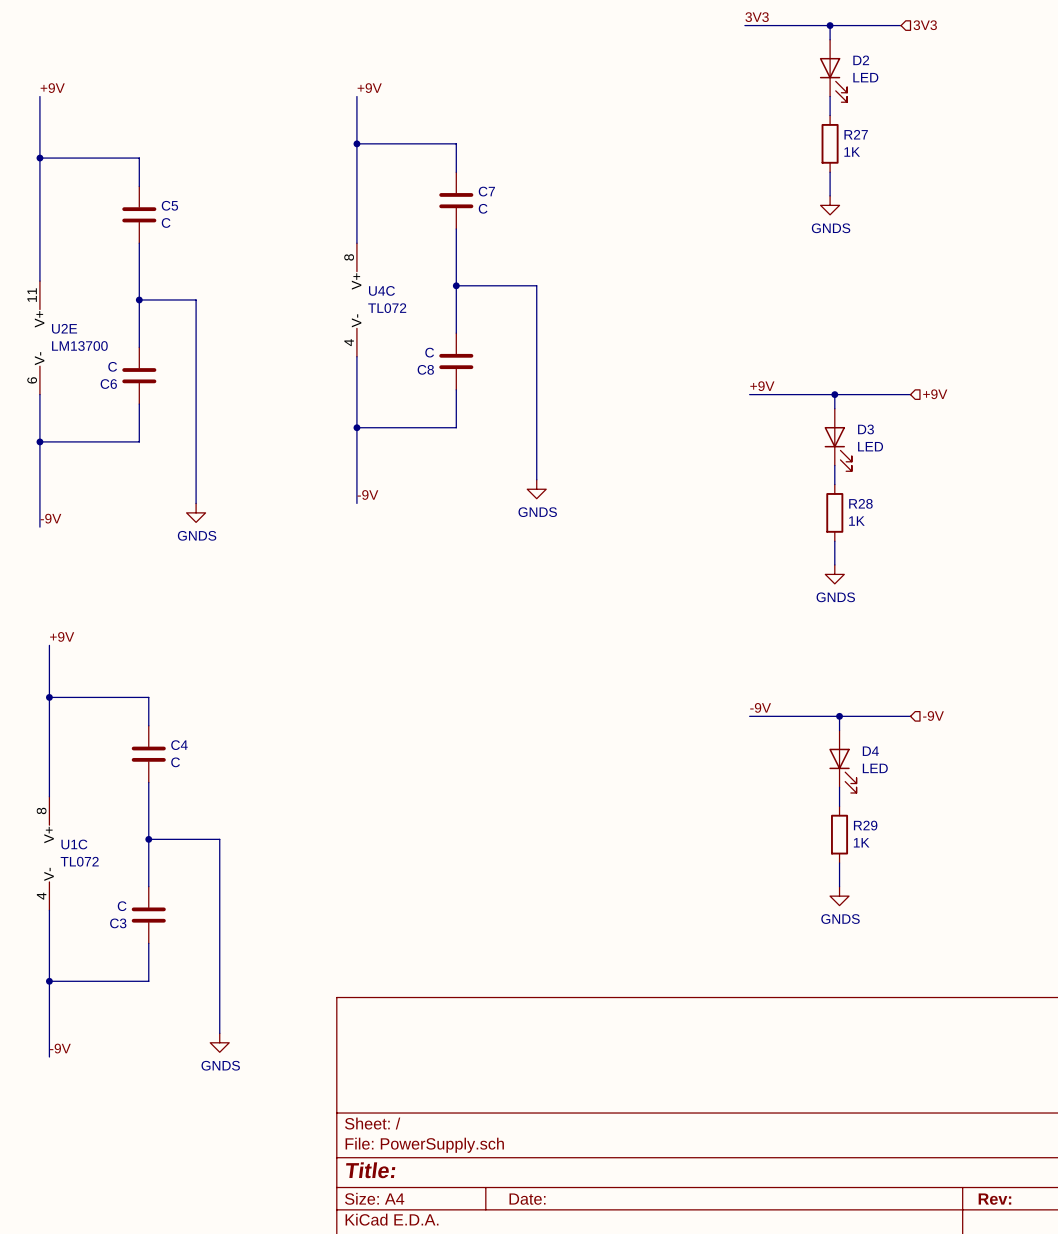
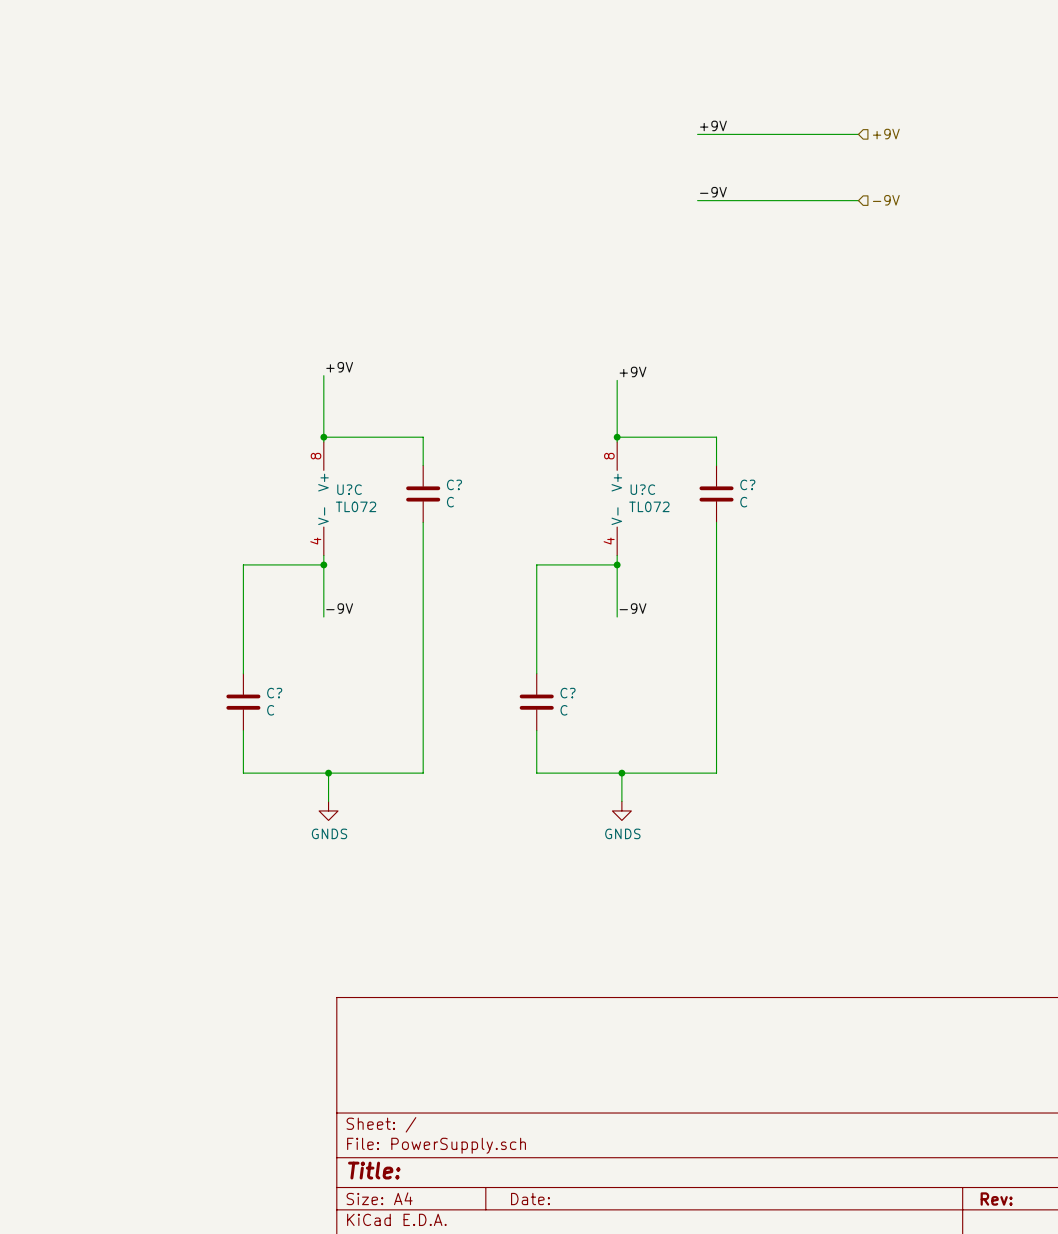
label: 3V3 (757, 17) -> none
wire: (744, 25) (901, 25) -> none
wire: (830, 25) (830, 39) -> none
junction: (830, 25) -> none
hierarchical label: 3V3 (925, 25) -> none
D2: LED (833, 70) -> none
label: +9V (52, 88) -> none
label: +9V (369, 88) -> none
wire: (39, 96) (39, 281) -> none
wire: (356, 96) (356, 243) -> none
wire: (830, 96) (830, 115) -> none
label: none -> +9V (713, 125)
wire: none -> (697, 134) (858, 134)
hierarchical label: none -> +9V (886, 134)
wire: (356, 143) (456, 143) (456, 172) -> none
junction: (356, 143) -> none
R27: 1K (830, 143) -> none
wire: (39, 158) (139, 158) (139, 186) -> none
junction: (39, 158) -> none
wire: (830, 172) (830, 195) -> none
label: none -> -9V (713, 192)
C7: C (456, 200) -> none
wire: none -> (697, 200) (858, 200)
hierarchical label: none -> -9V (886, 200)
power symbol: GNDS (830, 205) -> none
C5: C (139, 214) -> none
wire: (456, 229) (456, 333) -> none
wire: (139, 243) (139, 347) -> none
wire: (456, 285) (536, 285) (536, 479) -> none
junction: (456, 285) -> none
wire: (139, 299) (196, 299) (196, 503) -> none
junction: (139, 299) -> none
U4C: TL072 (356, 299) -> none
U2E: LM13700 (39, 337) -> none
wire: (356, 356) (356, 503) -> none
C8: C (456, 361) -> none
label: none -> +9V (339, 367)
label: none -> +9V (633, 371)
C6: C (139, 375) -> none
wire: none -> (323, 375) (323, 441)
wire: none -> (617, 380) (617, 441)
label: +9V (762, 386) -> none
wire: (456, 389) (456, 427) (356, 427) -> none
wire: (39, 394) (39, 527) -> none
wire: (749, 394) (910, 394) -> none
wire: (834, 394) (834, 408) -> none
junction: (834, 394) -> none
hierarchical label: +9V (935, 394) -> none
wire: (139, 404) (139, 441) (39, 441) -> none
junction position: (356, 427) -> (323, 437)
wire: none -> (323, 437) (423, 437) (423, 465)
wire: none -> (617, 437) (716, 437) (716, 465)
junction: none -> (617, 437)
D3: LED (838, 440) -> none
junction: (39, 441) -> none
wire: (834, 465) (834, 484) -> none
power symbol: GNDS (536, 489) -> none
C?: none -> C (423, 493)
C?: none -> C (716, 493)
label position: -9V (367, 494) -> -9V (339, 608)
U?C: none -> TL072 (323, 498)
U?C: none -> TL072 (617, 498)
power symbol: GNDS (196, 512) -> none
R28: 1K (834, 512) -> none
label: -9V (50, 518) -> none
wire: none -> (423, 522) (423, 773) (243, 773) (243, 730)
wire: none -> (716, 522) (716, 773) (536, 773) (536, 730)
wire: (834, 541) (834, 564) -> none
wire: none -> (323, 555) (323, 616)
wire: none -> (617, 555) (617, 616)
wire: none -> (323, 564) (243, 564) (243, 673)
junction: none -> (323, 564)
wire: none -> (617, 564) (536, 564) (536, 673)
junction: none -> (617, 564)
power symbol: GNDS (834, 574) -> none
label: none -> -9V (633, 608)
label: +9V (62, 636) -> none
wire: (49, 645) (49, 796) -> none
wire: (49, 697) (148, 697) (148, 725) -> none
junction: (49, 697) -> none
C?: none -> C (243, 702)
C?: none -> C (536, 702)
label: -9V (760, 707) -> none
hierarchical label: -9V (933, 715) -> none
wire: (749, 716) (910, 716) -> none
wire: (839, 716) (839, 730) -> none
junction: (839, 716) -> none
C4: C (148, 754) -> none
D4: LED (842, 761) -> none
wire: none -> (328, 773) (328, 801)
junction: none -> (328, 773)
wire: none -> (621, 773) (621, 801)
junction: none -> (621, 773)
wire: (148, 782) (148, 886) -> none
wire: (839, 787) (839, 806) -> none
power symbol: none -> GNDS (328, 810)
power symbol: none -> GNDS (621, 810)
R29: 1K (839, 834) -> none
wire: (148, 839) (219, 839) (219, 1033) -> none
junction: (148, 839) -> none
U1C: TL072 (49, 853) -> none
wire: (839, 863) (839, 886) -> none
power symbol: GNDS (839, 896) -> none
wire: (49, 910) (49, 1057) -> none
C3: C (148, 915) -> none
wire: (148, 943) (148, 981) (49, 981) -> none
junction: (49, 981) -> none
power symbol: GNDS (219, 1042) -> none
label: -9V (60, 1048) -> none

